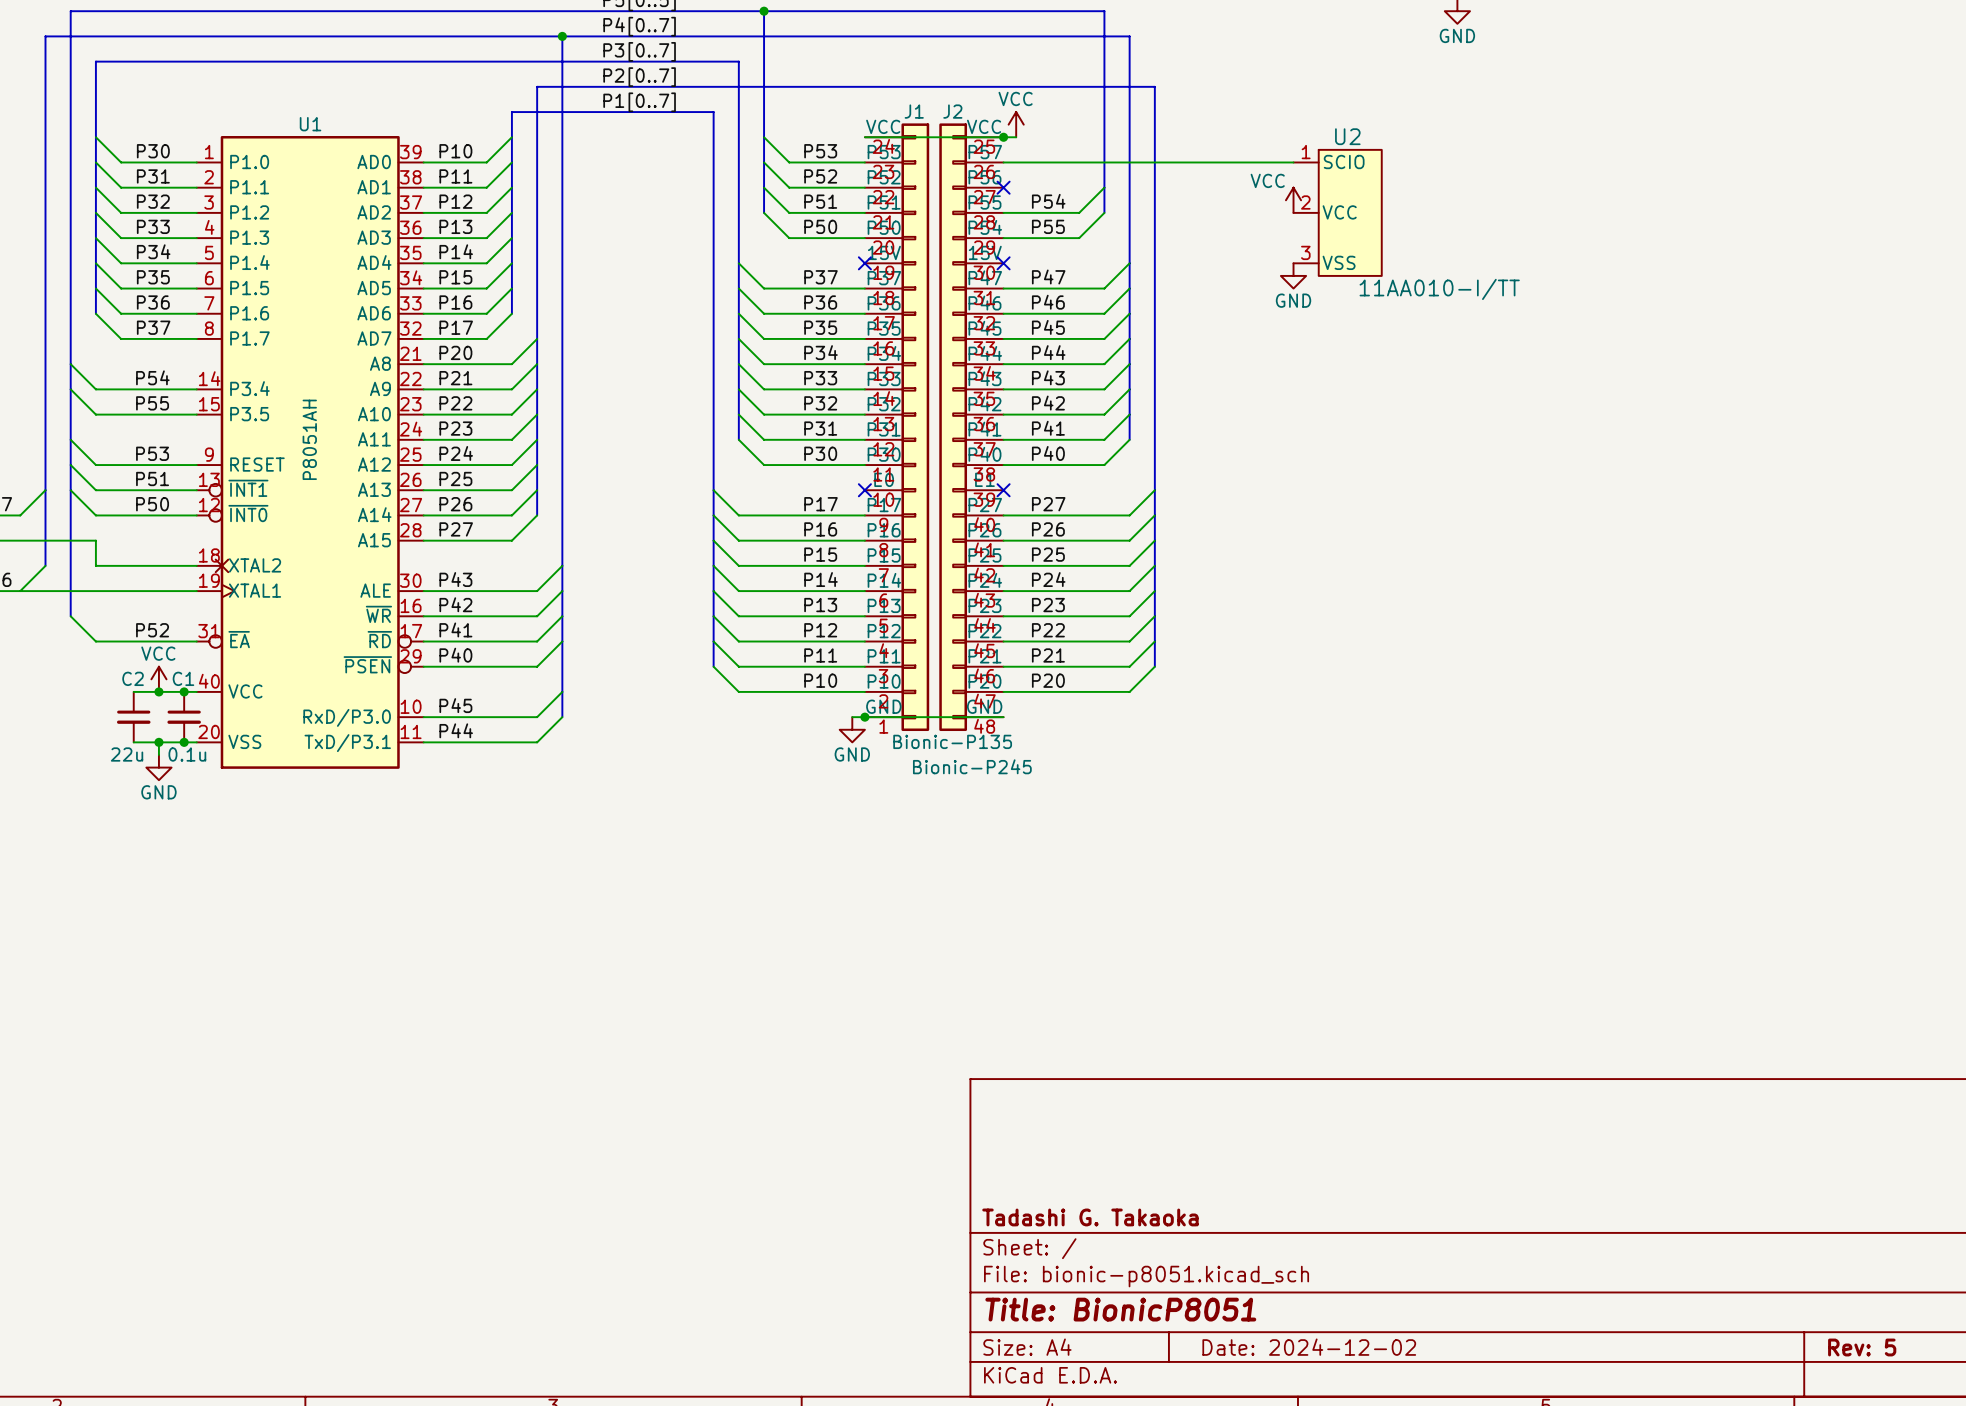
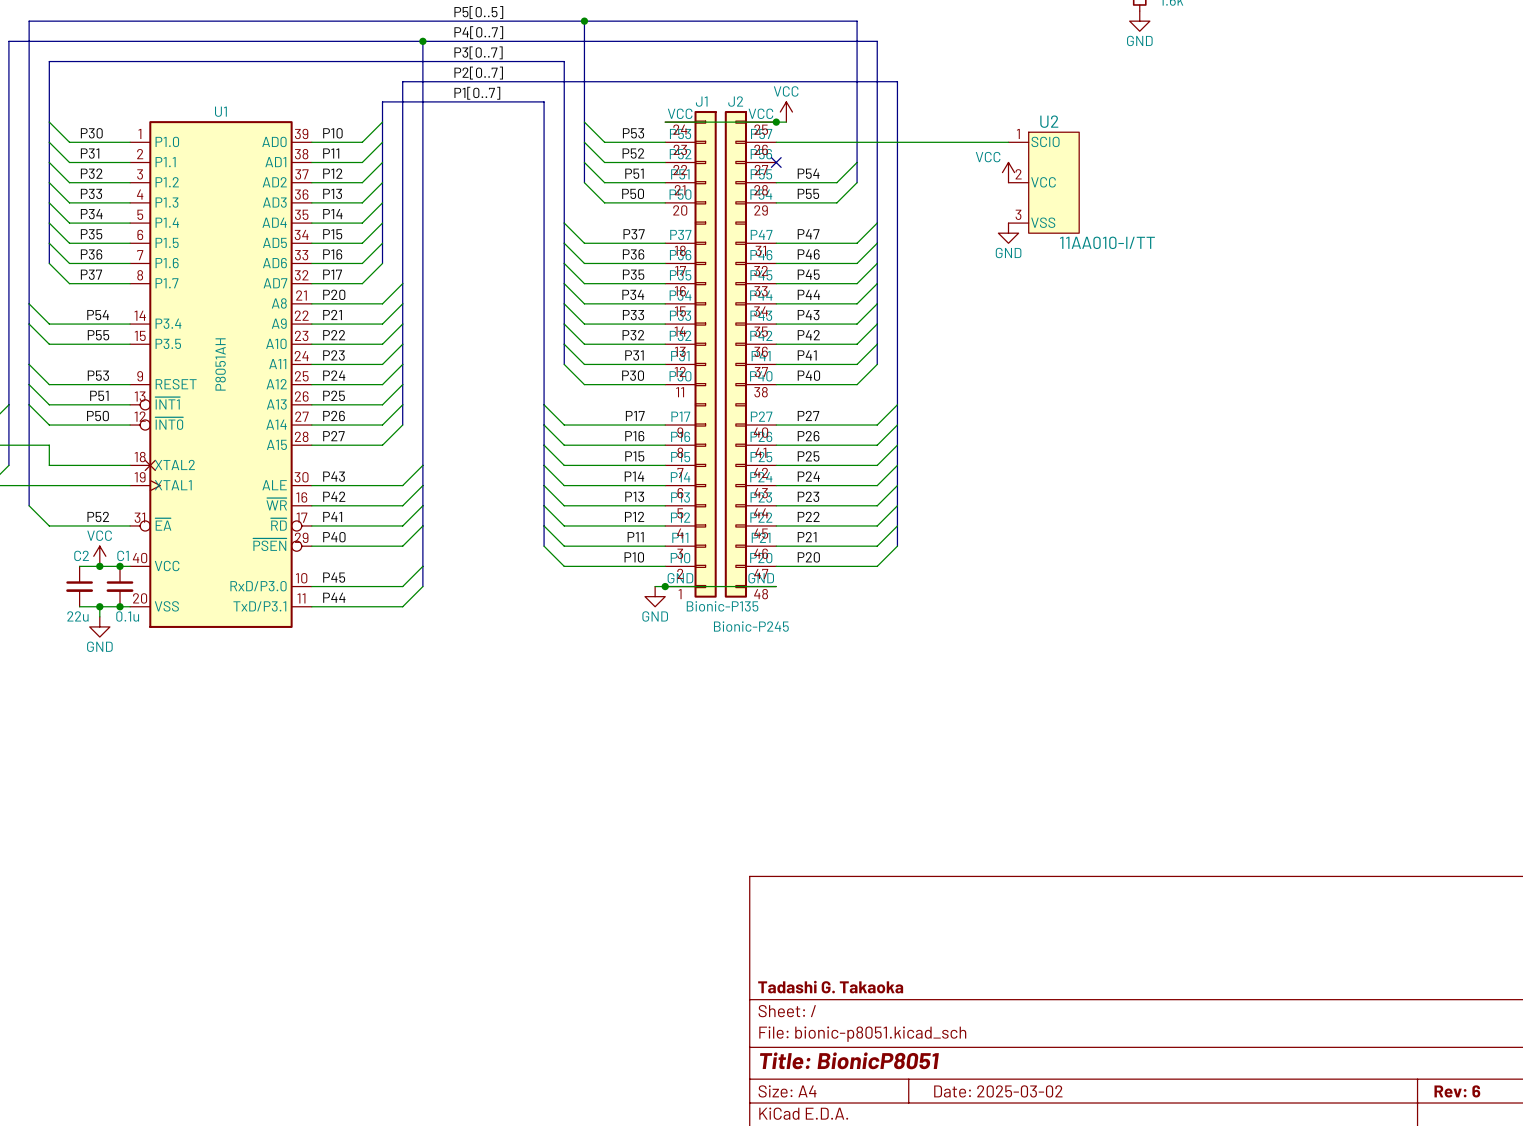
J1 symbol: [864, 123, 930, 732] -> [665, 111, 717, 598]
J2 symbol: [939, 123, 1004, 732] -> [724, 111, 777, 598]
no-connect mark: (864, 263) -> none
no-connect mark: (1003, 263) -> none
no-connect mark: (864, 490) -> none
no-connect mark: (1003, 490) -> none
title block: Date: 2024-12-02 (1309, 1347) -> Date: 2025-03-02 (998, 1091)
title block: Rev: 5 (1862, 1347) -> Rev: 6 (1457, 1091)

